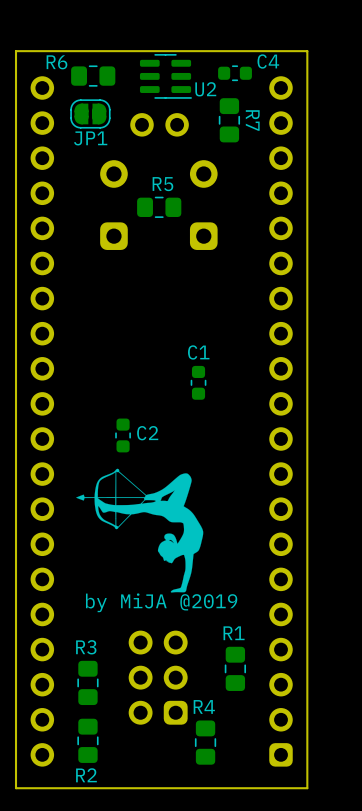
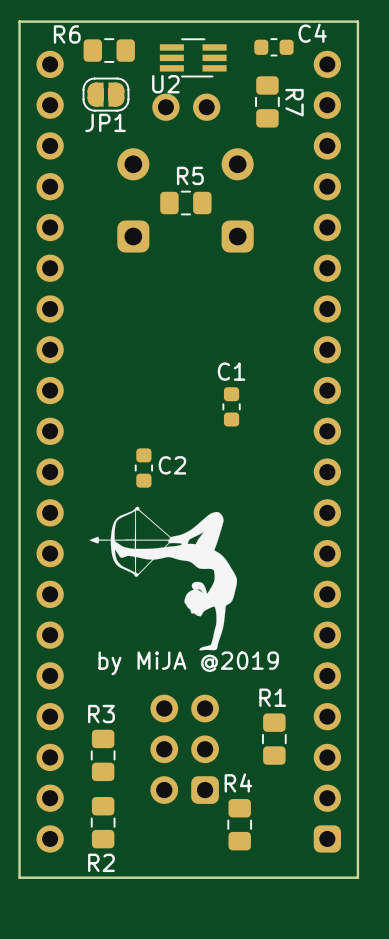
U2 footprint: [139, 54, 192, 99] -> [159, 38, 227, 78]
U2 name position: U2 (205, 89) -> U2 (165, 84)

